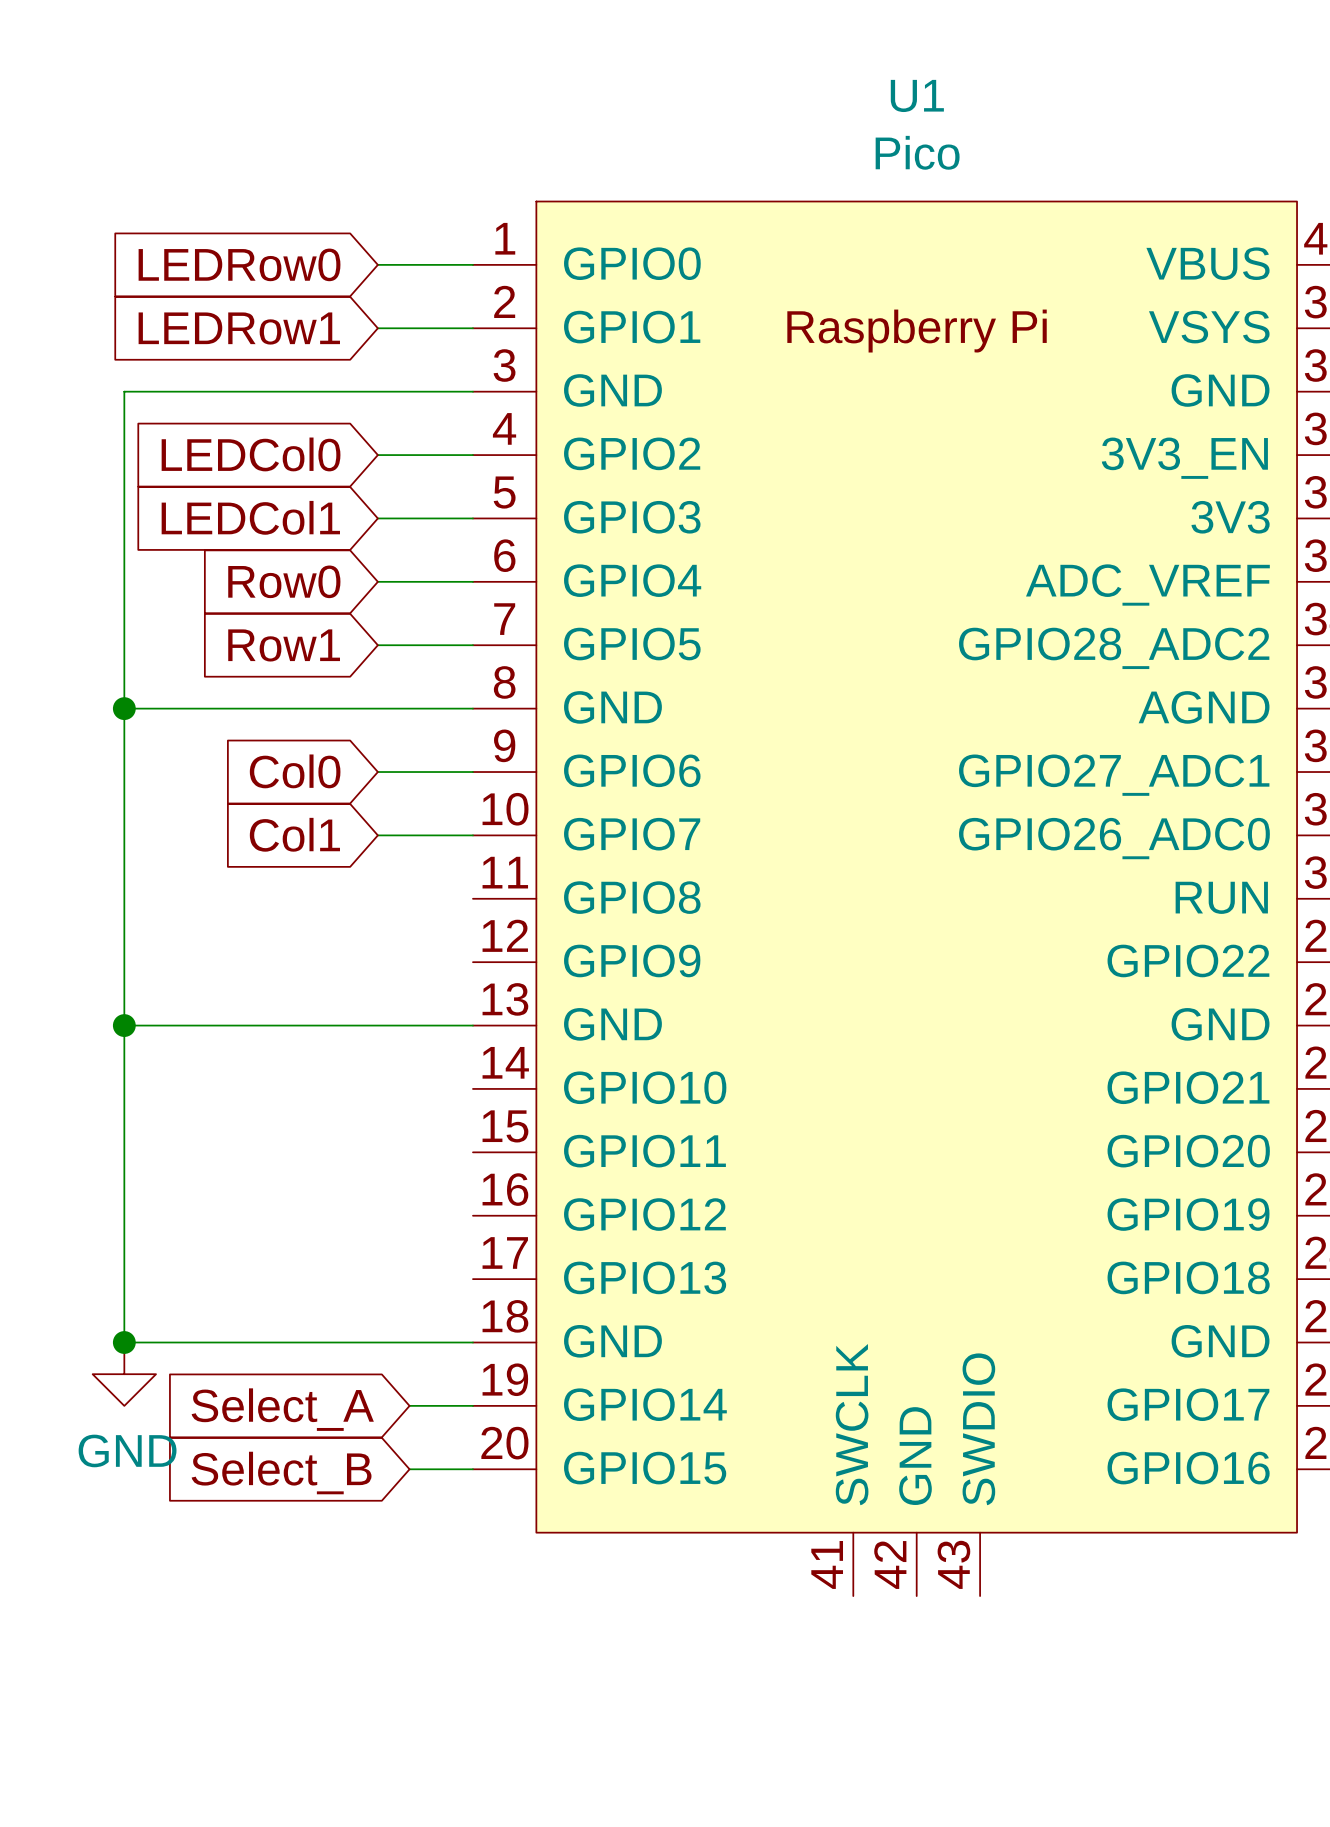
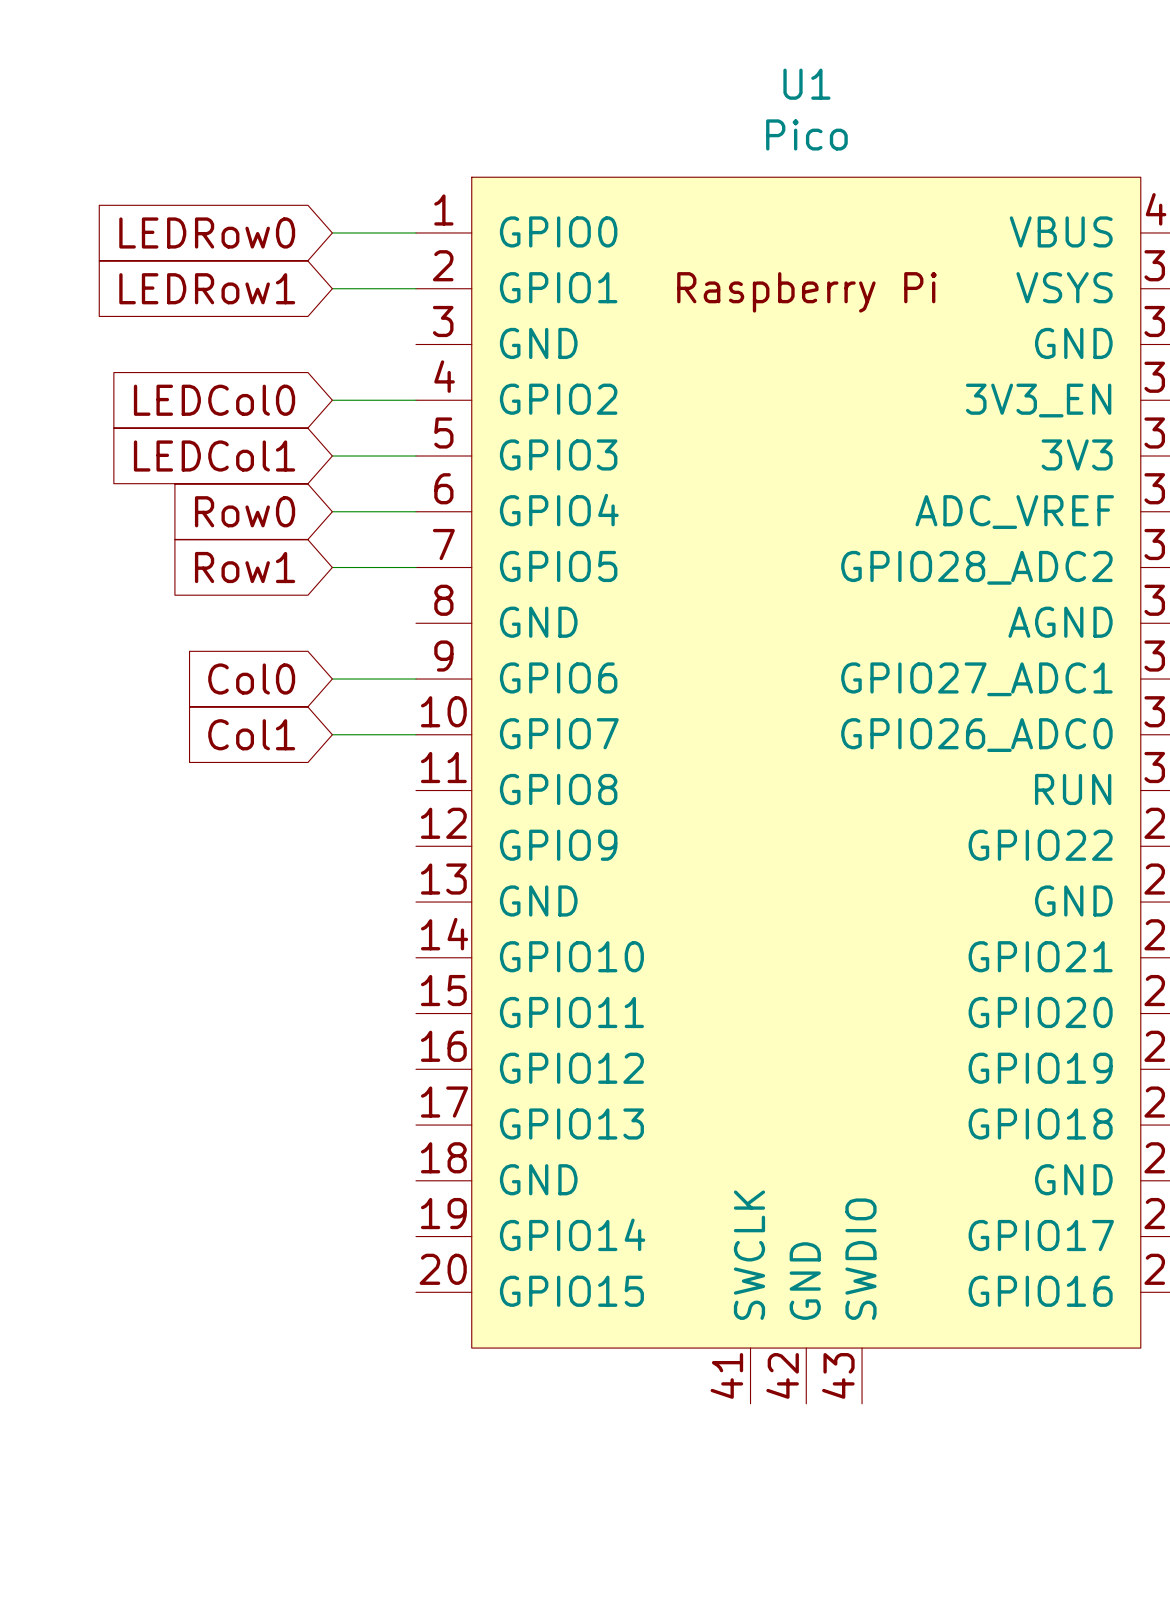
wire: (472, 391) (124, 391) (124, 1342) (472, 1342) -> none
wire: (124, 708) (472, 708) -> none
junction: (124, 708) -> none
wire: (124, 1025) (472, 1025) -> none
junction: (124, 1025) -> none
junction: (124, 1342) -> none
power symbol: GND (124, 1374) -> none
wire: (409, 1405) (472, 1405) -> none
global label: Select_A (282, 1409) -> none
wire: (409, 1469) (472, 1469) -> none
global label: Select_B (281, 1473) -> none

